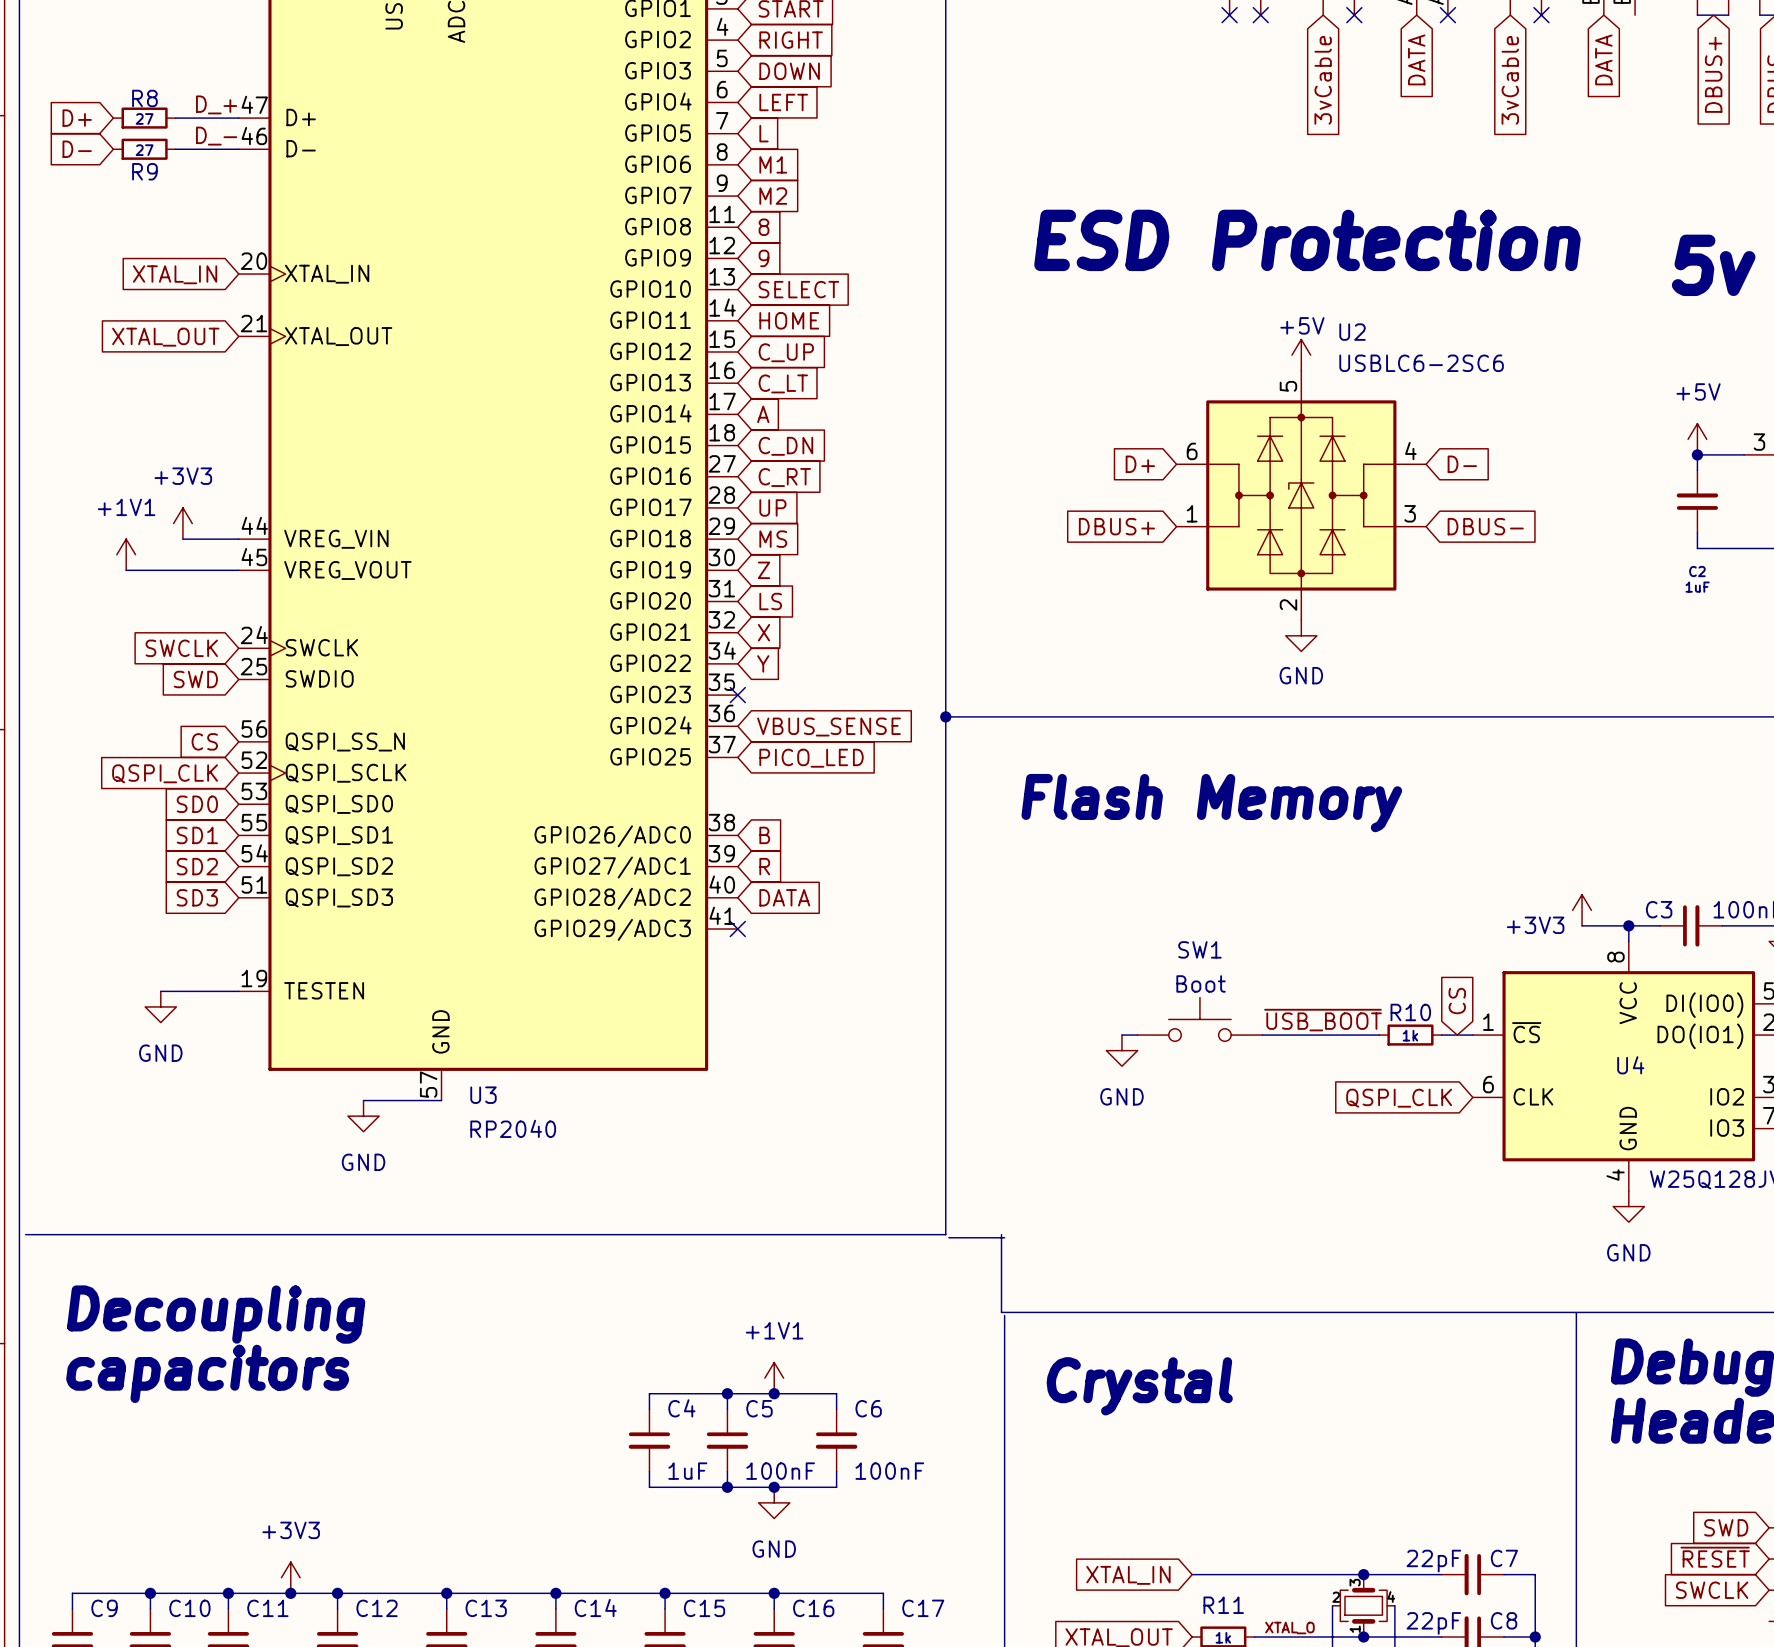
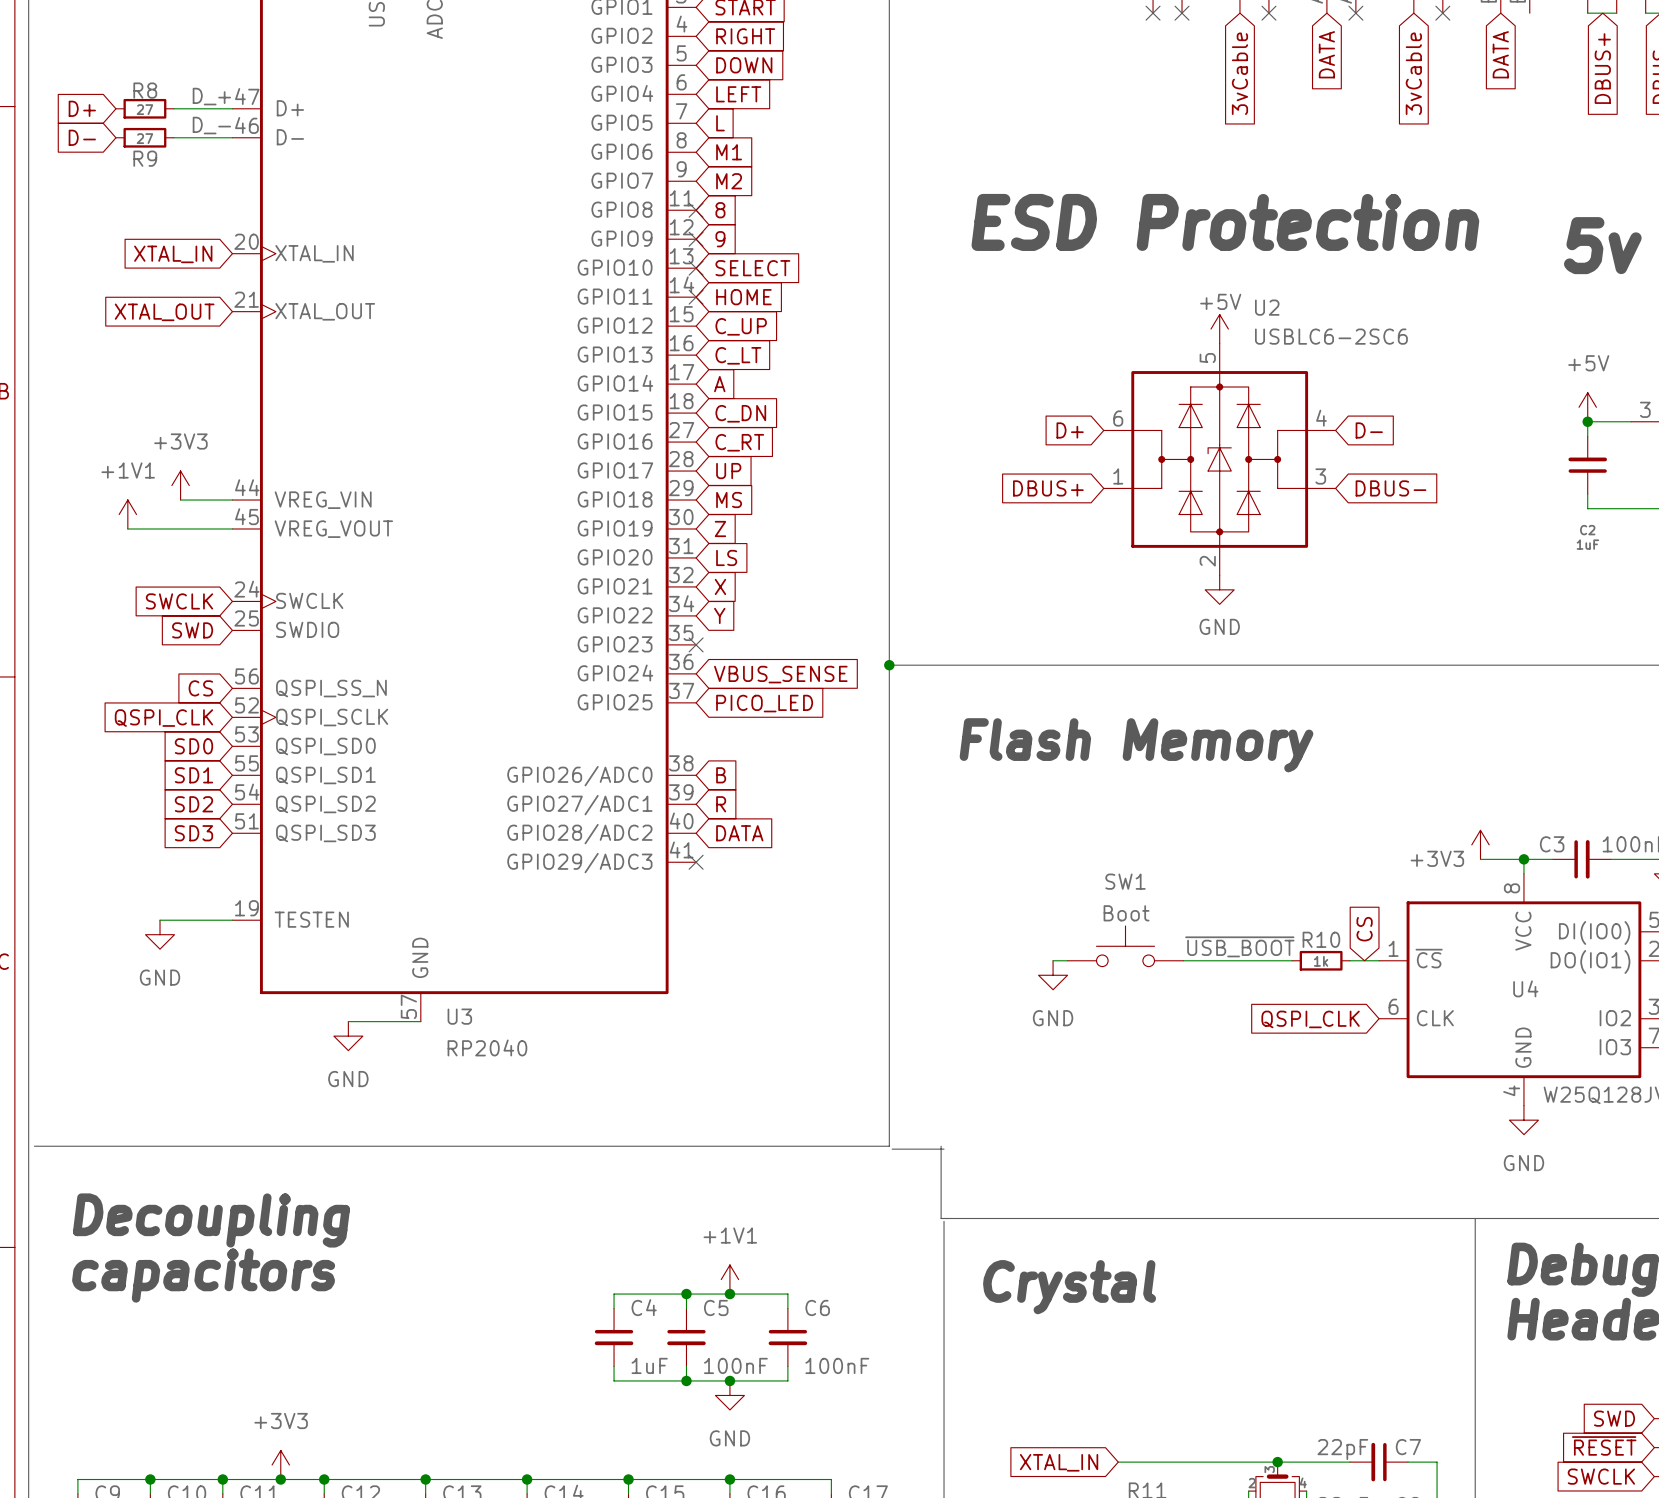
no-connect mark: none -> (696, 210)
no-connect mark: none -> (696, 239)
no-connect mark: none -> (696, 268)
no-connect mark: none -> (696, 297)

